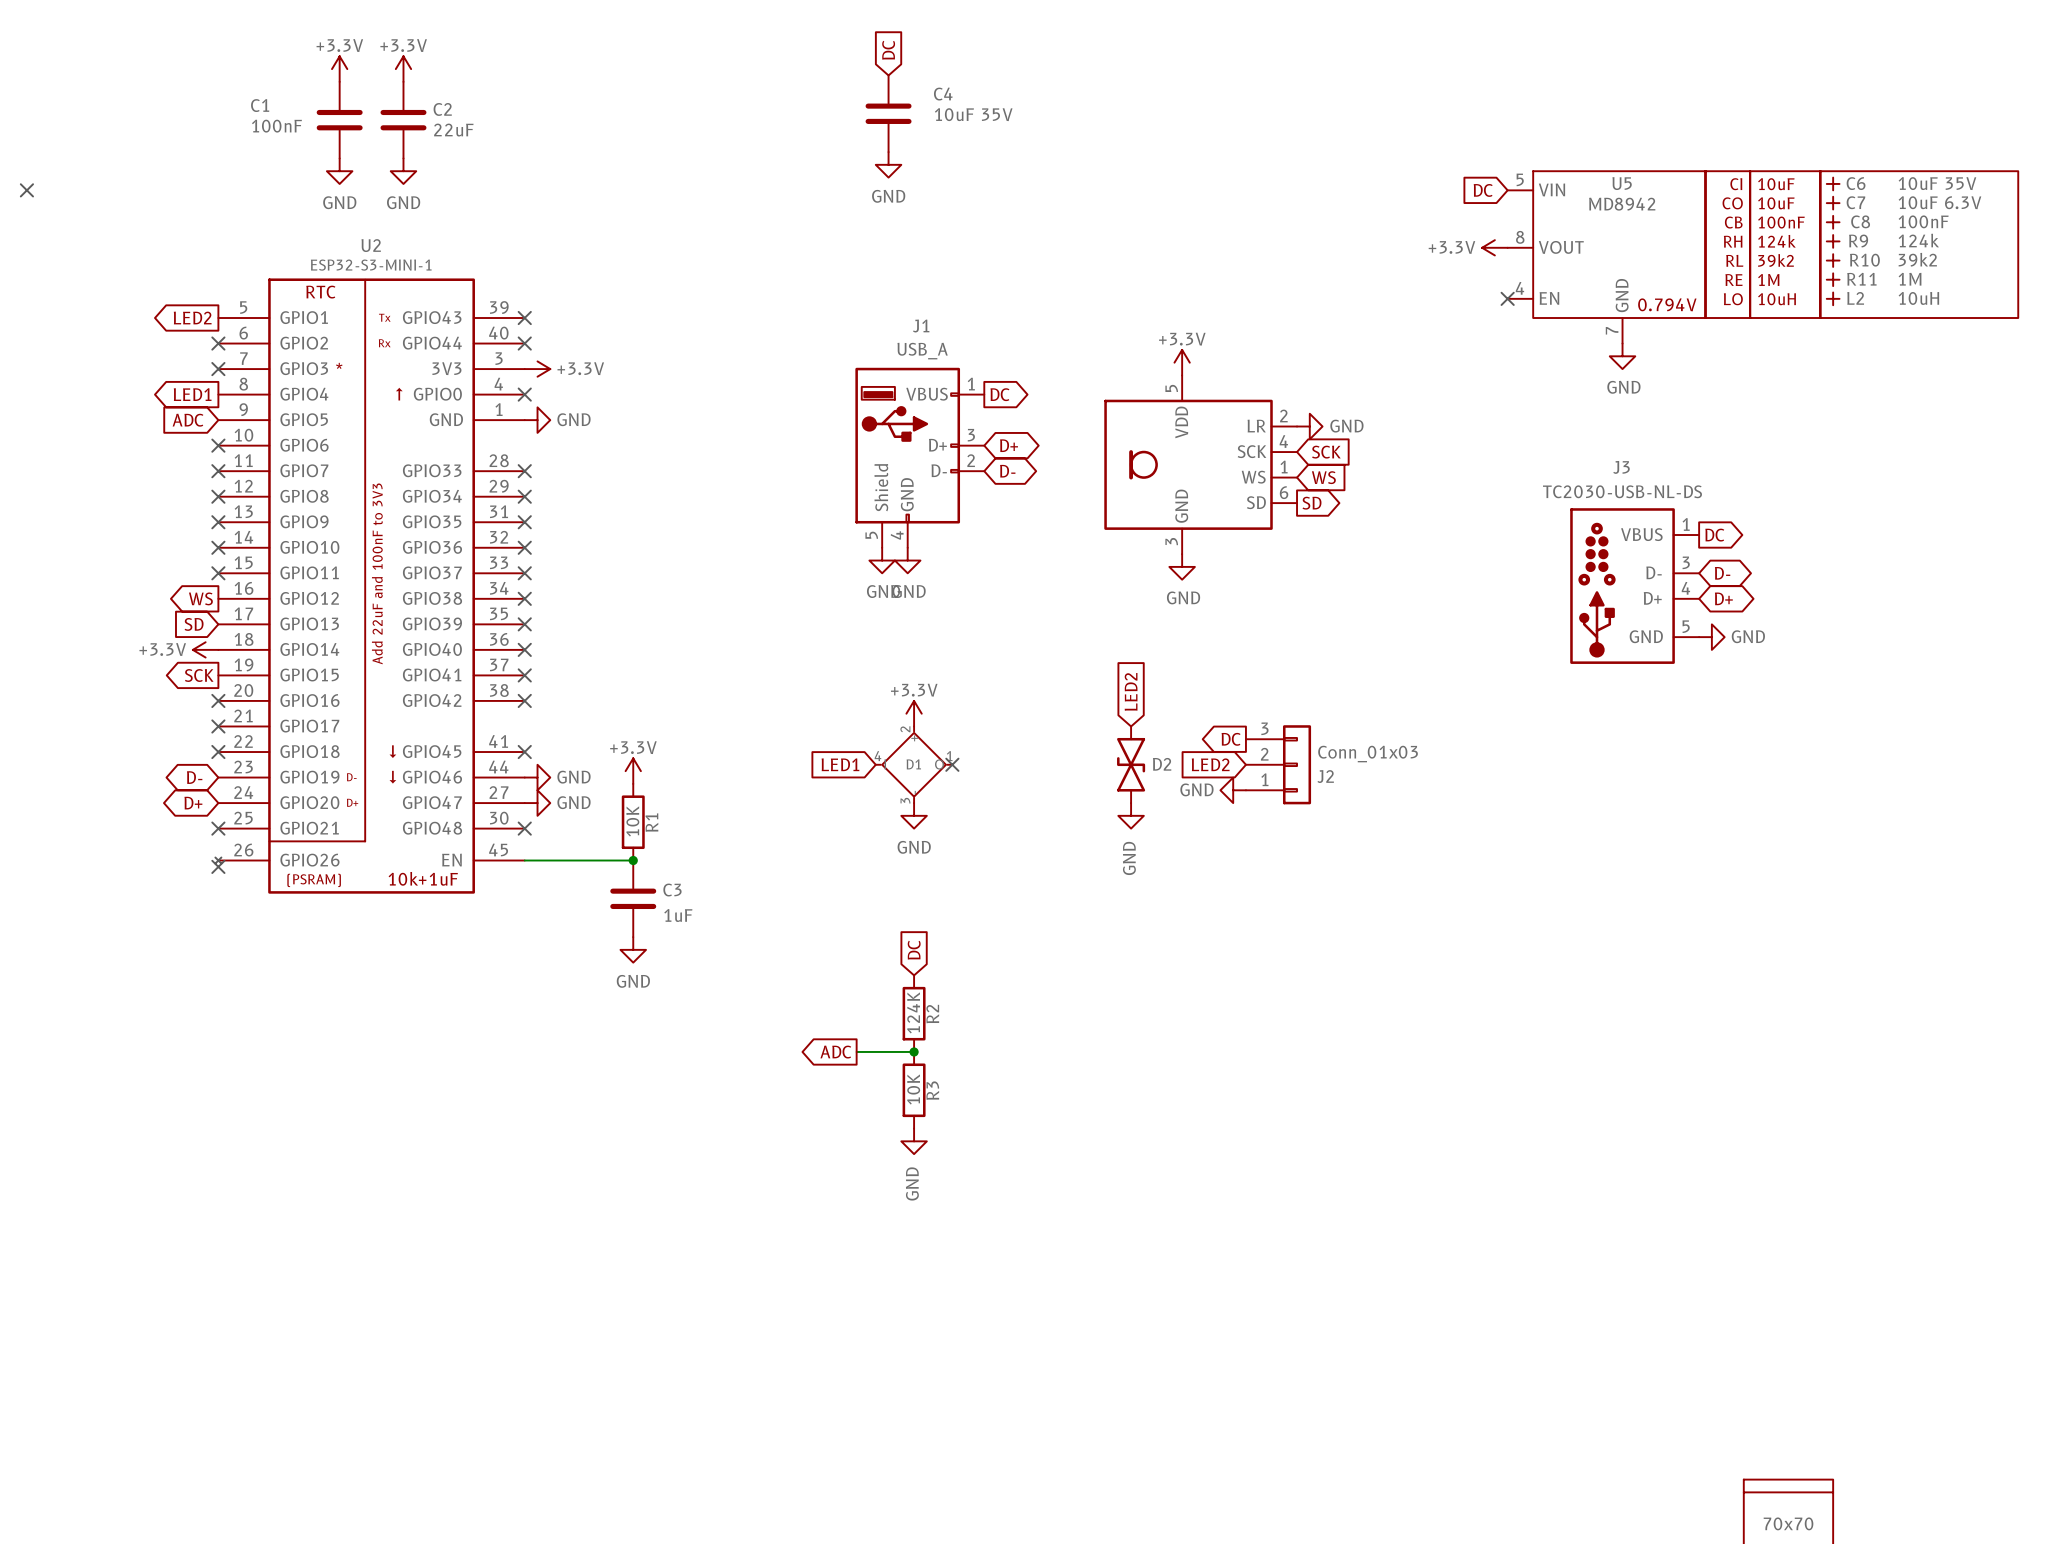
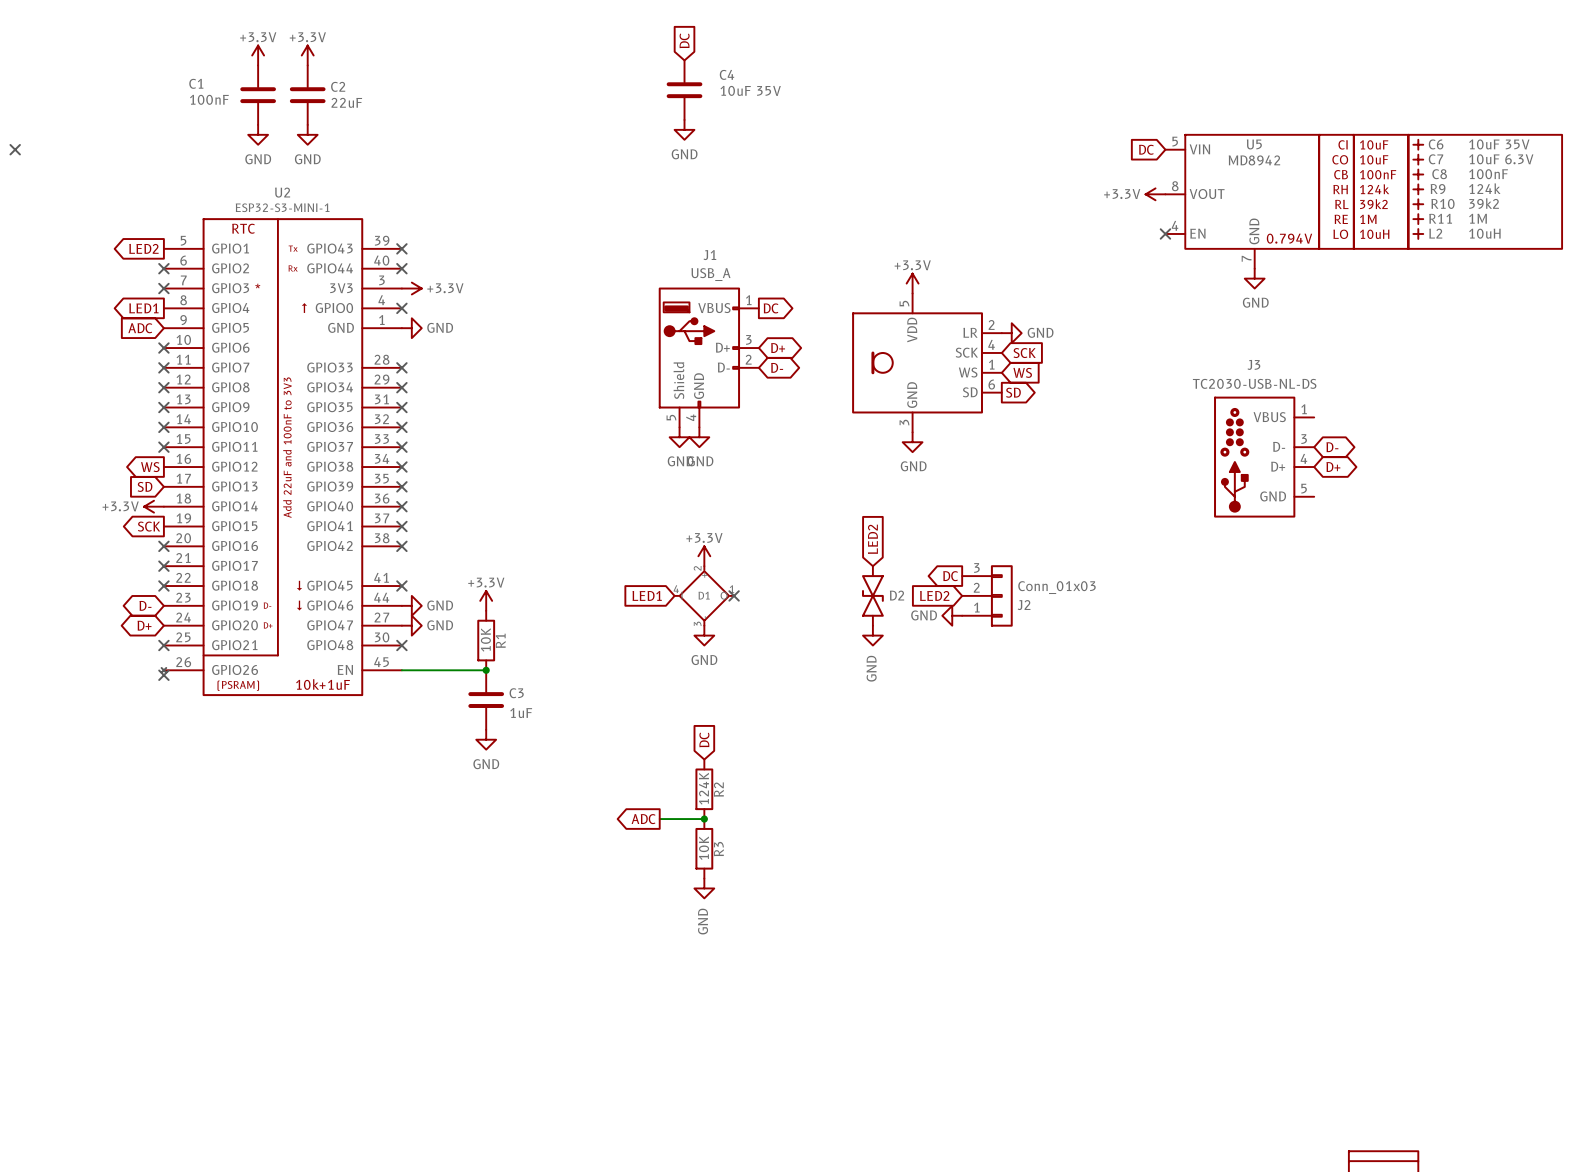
global label: DC (1714, 535) -> none
power symbol: GND (1711, 637) -> none

